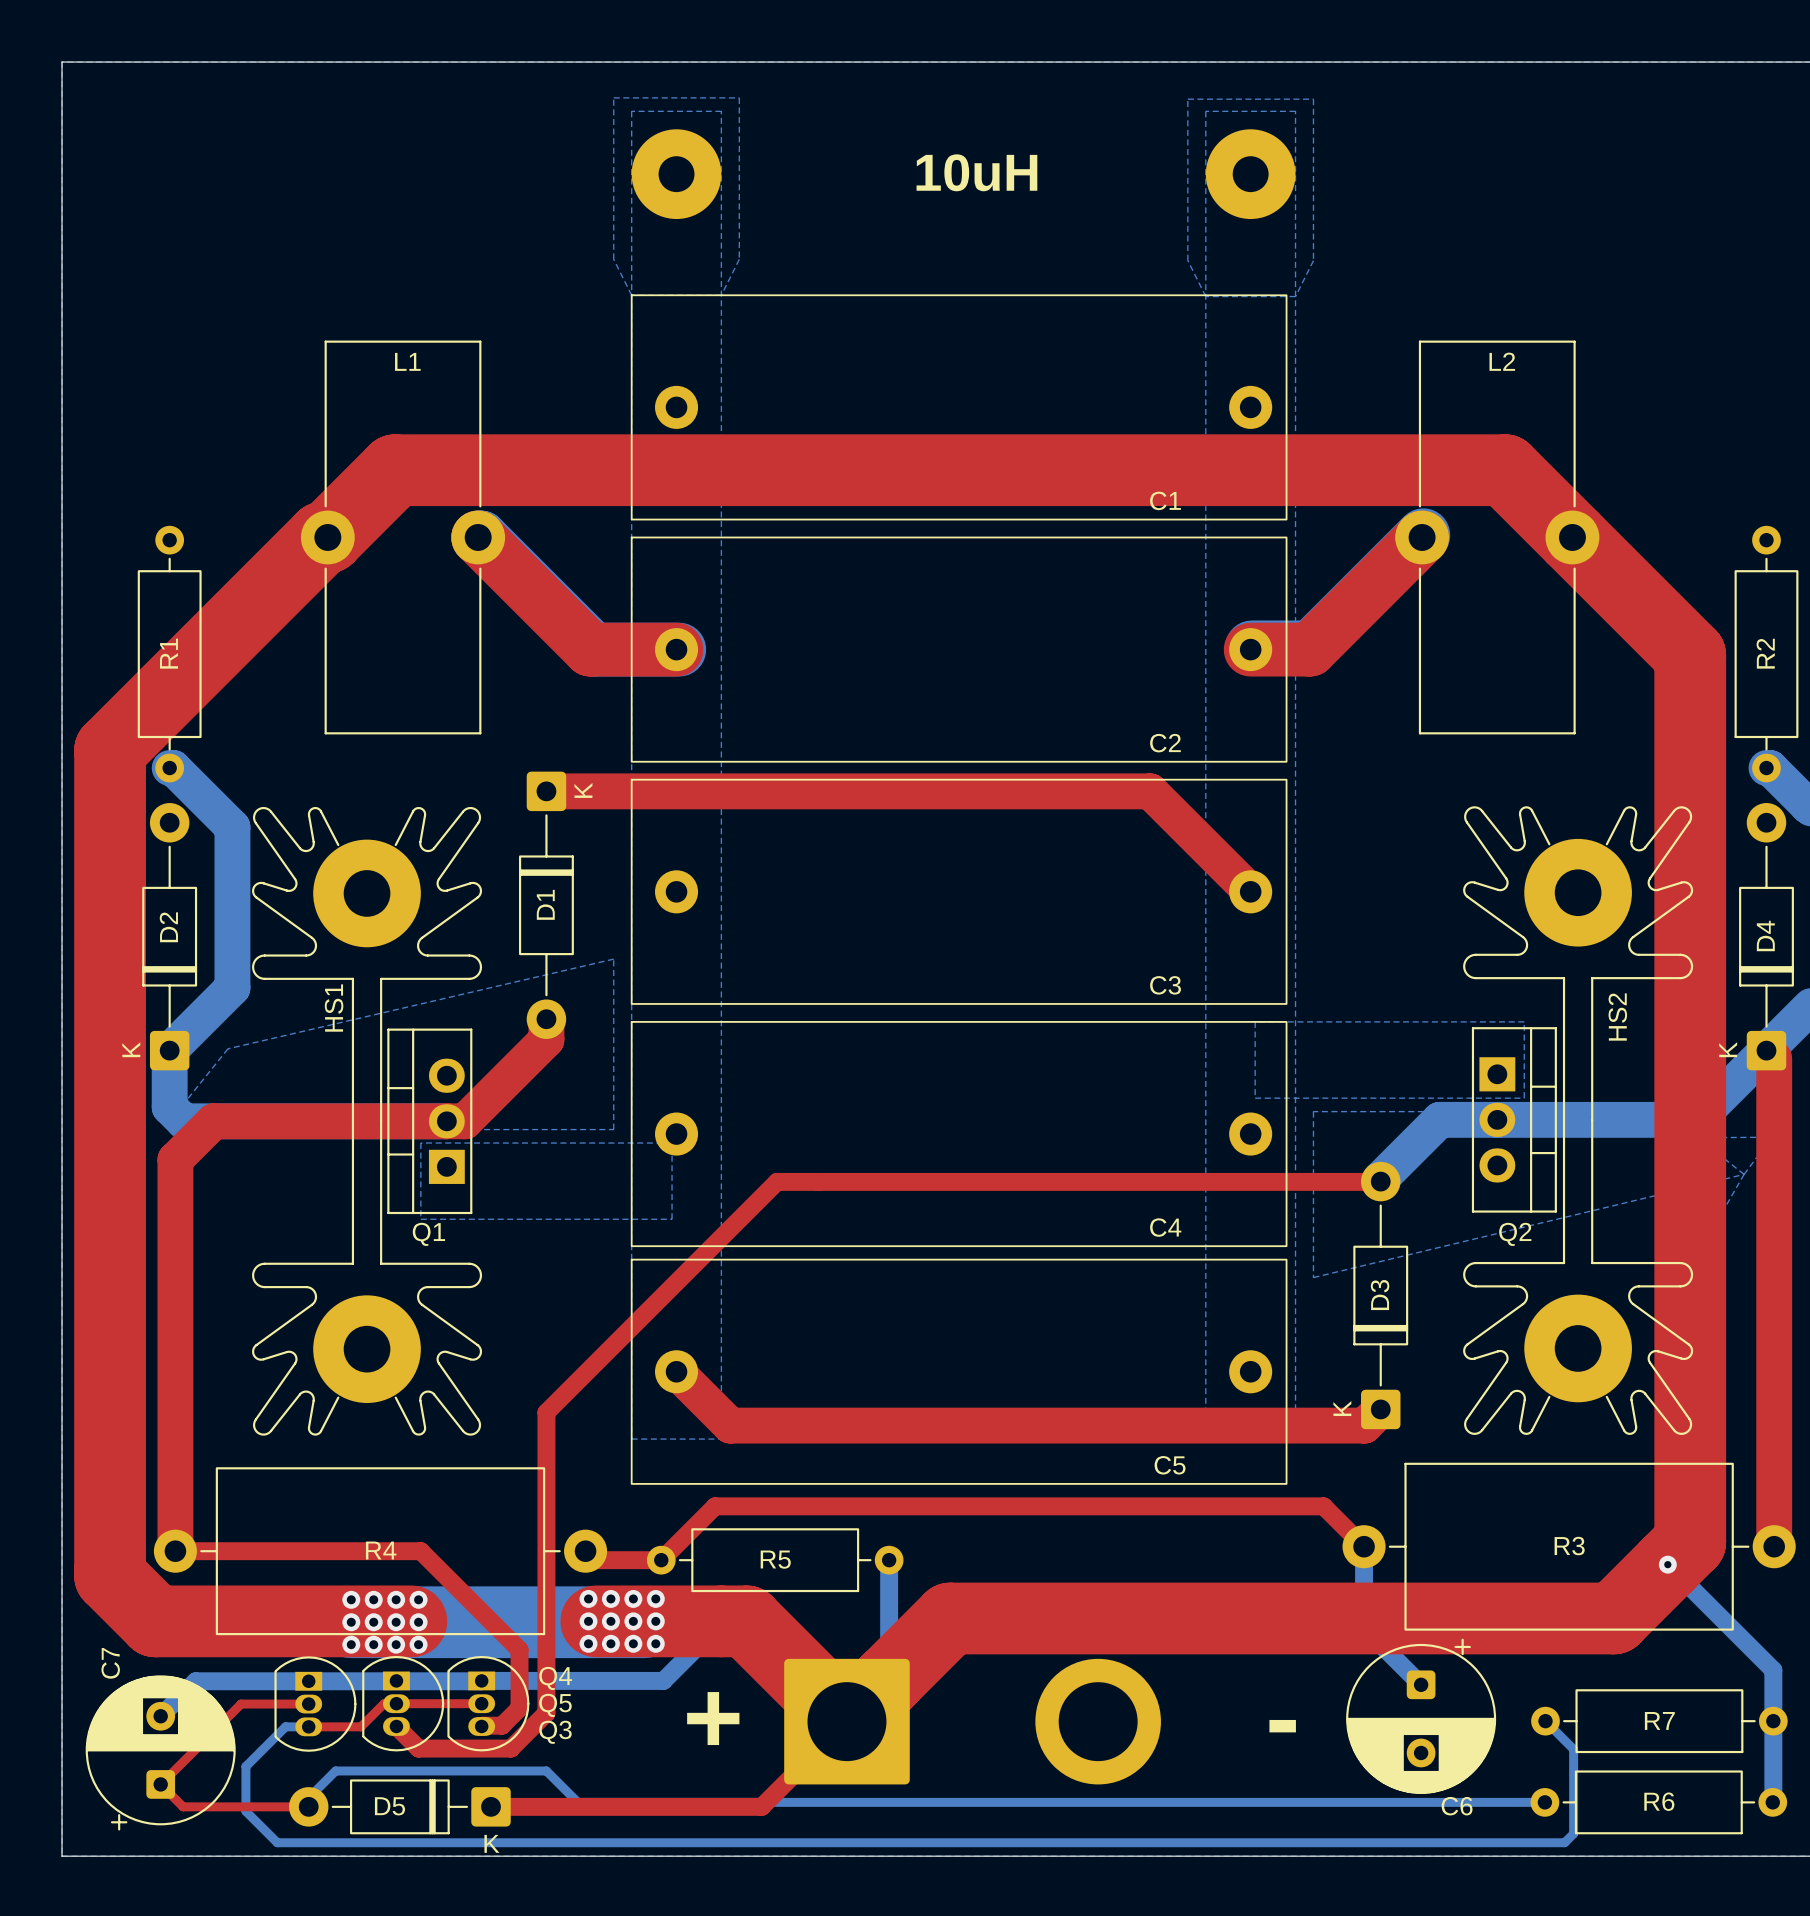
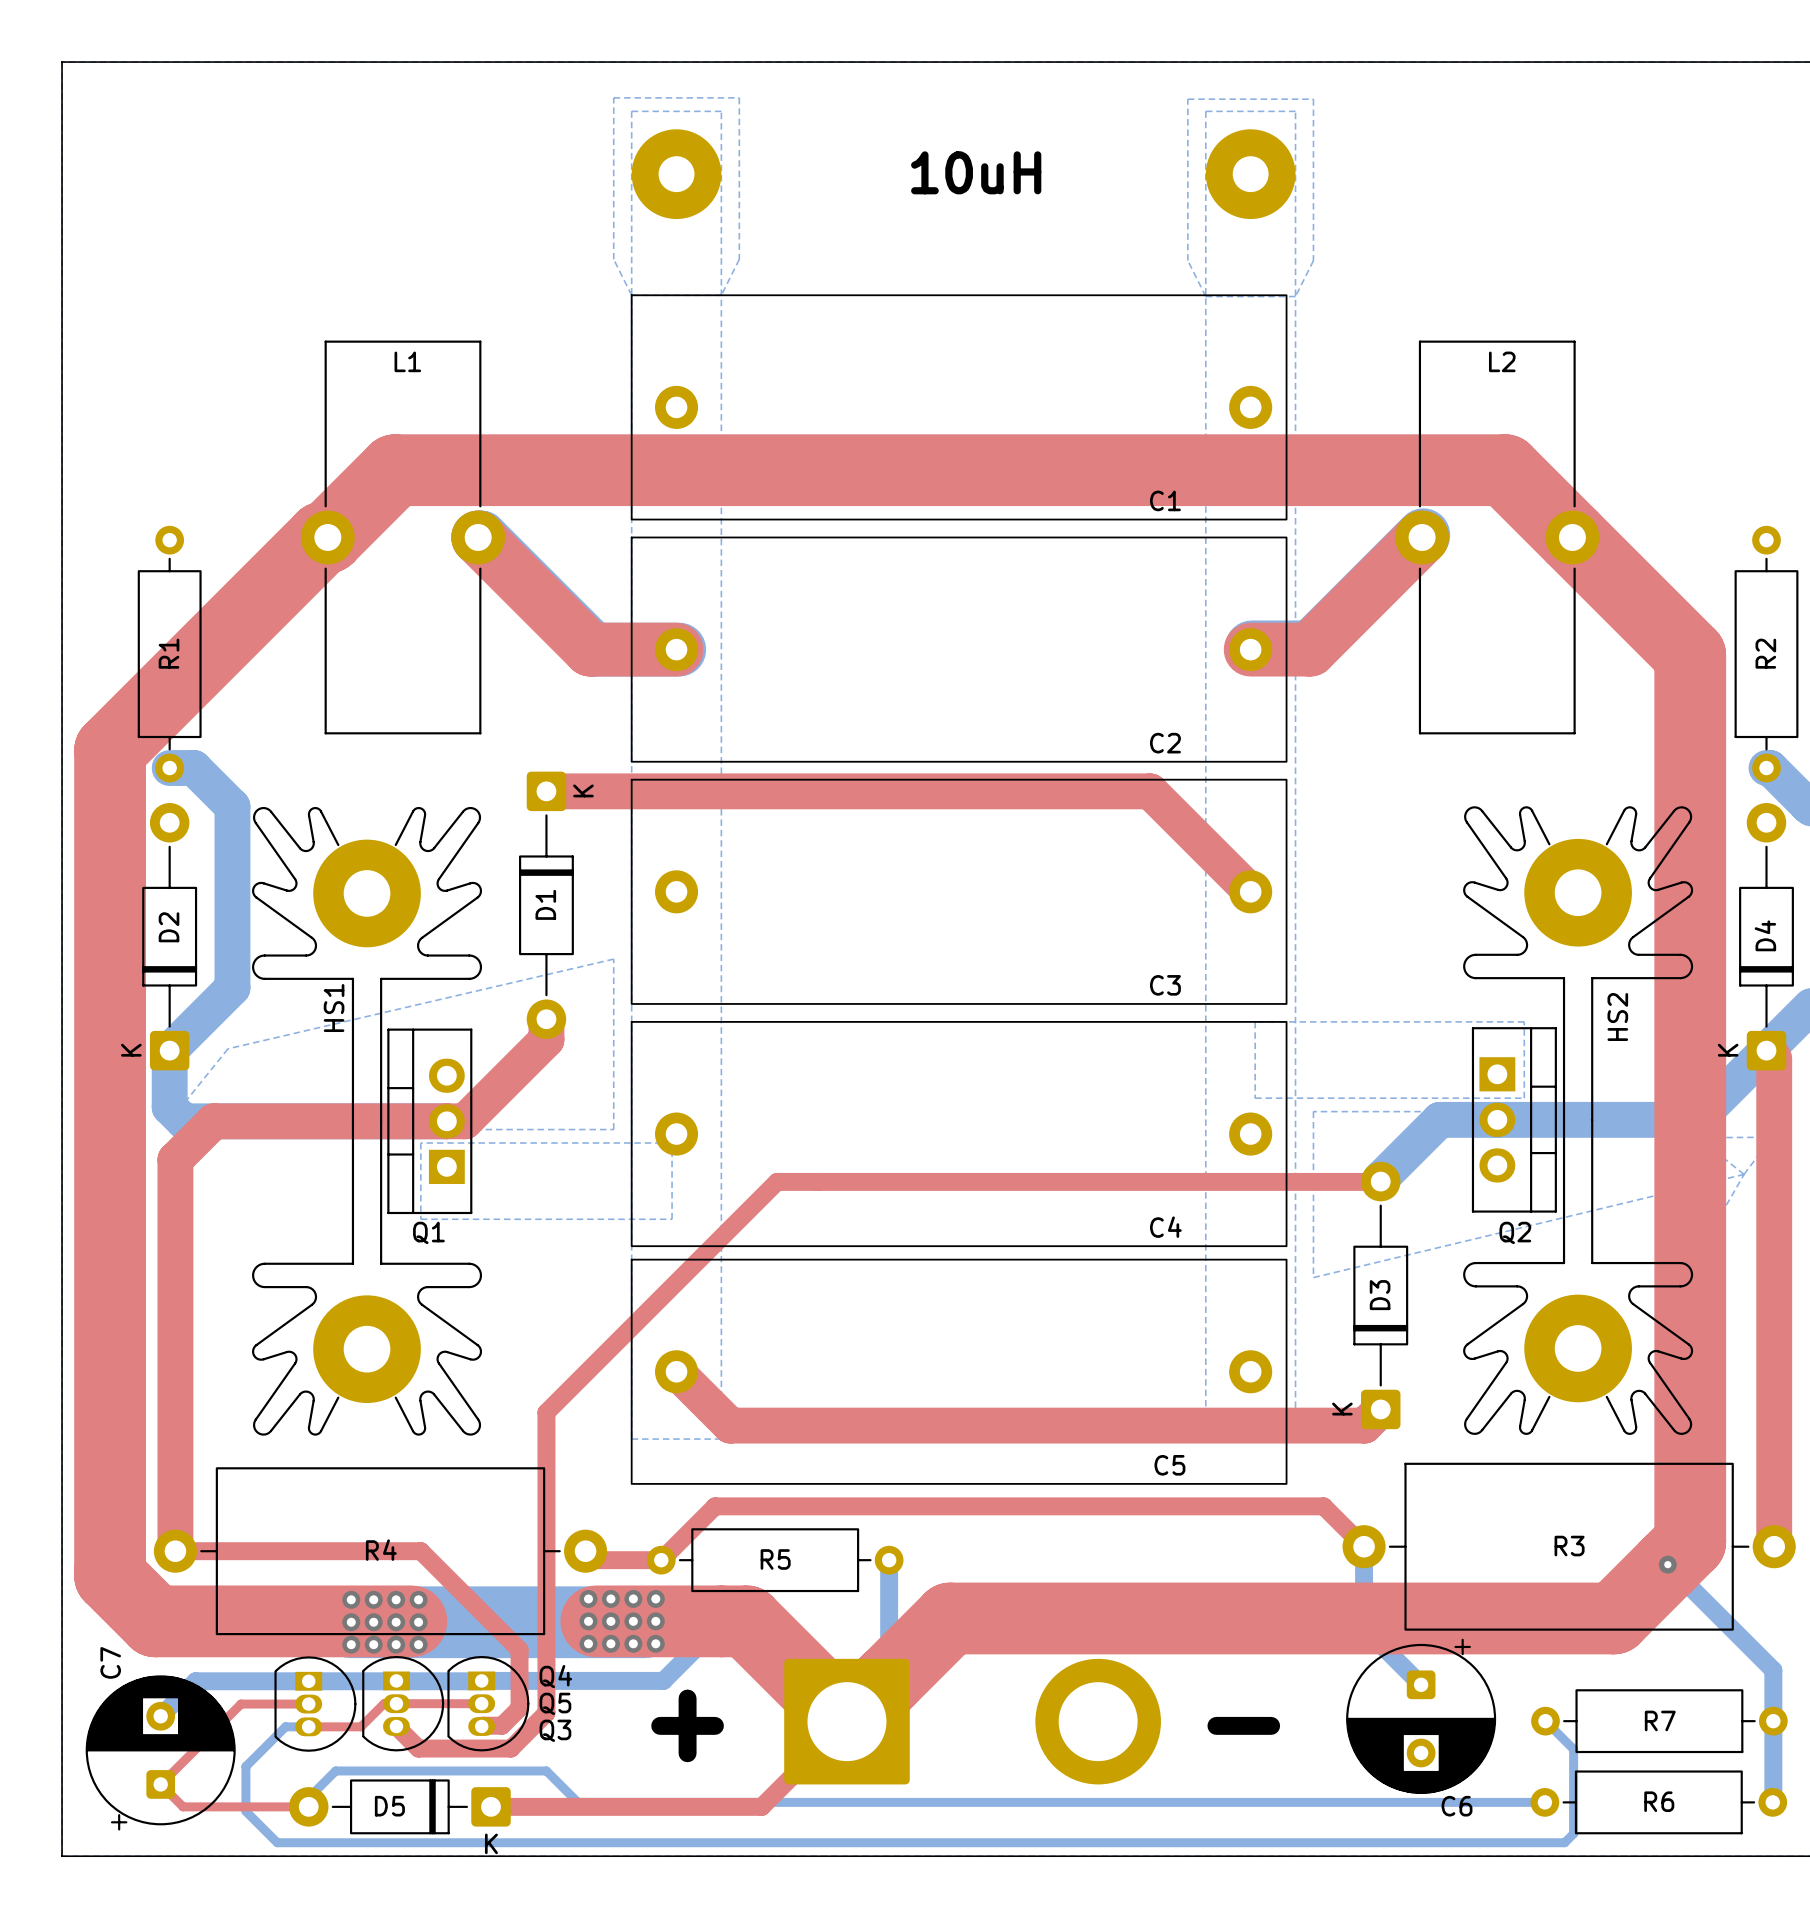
bottom track: (173, 768) (232, 827) -> (173, 768) (193, 768) (232, 806) (232, 827)

